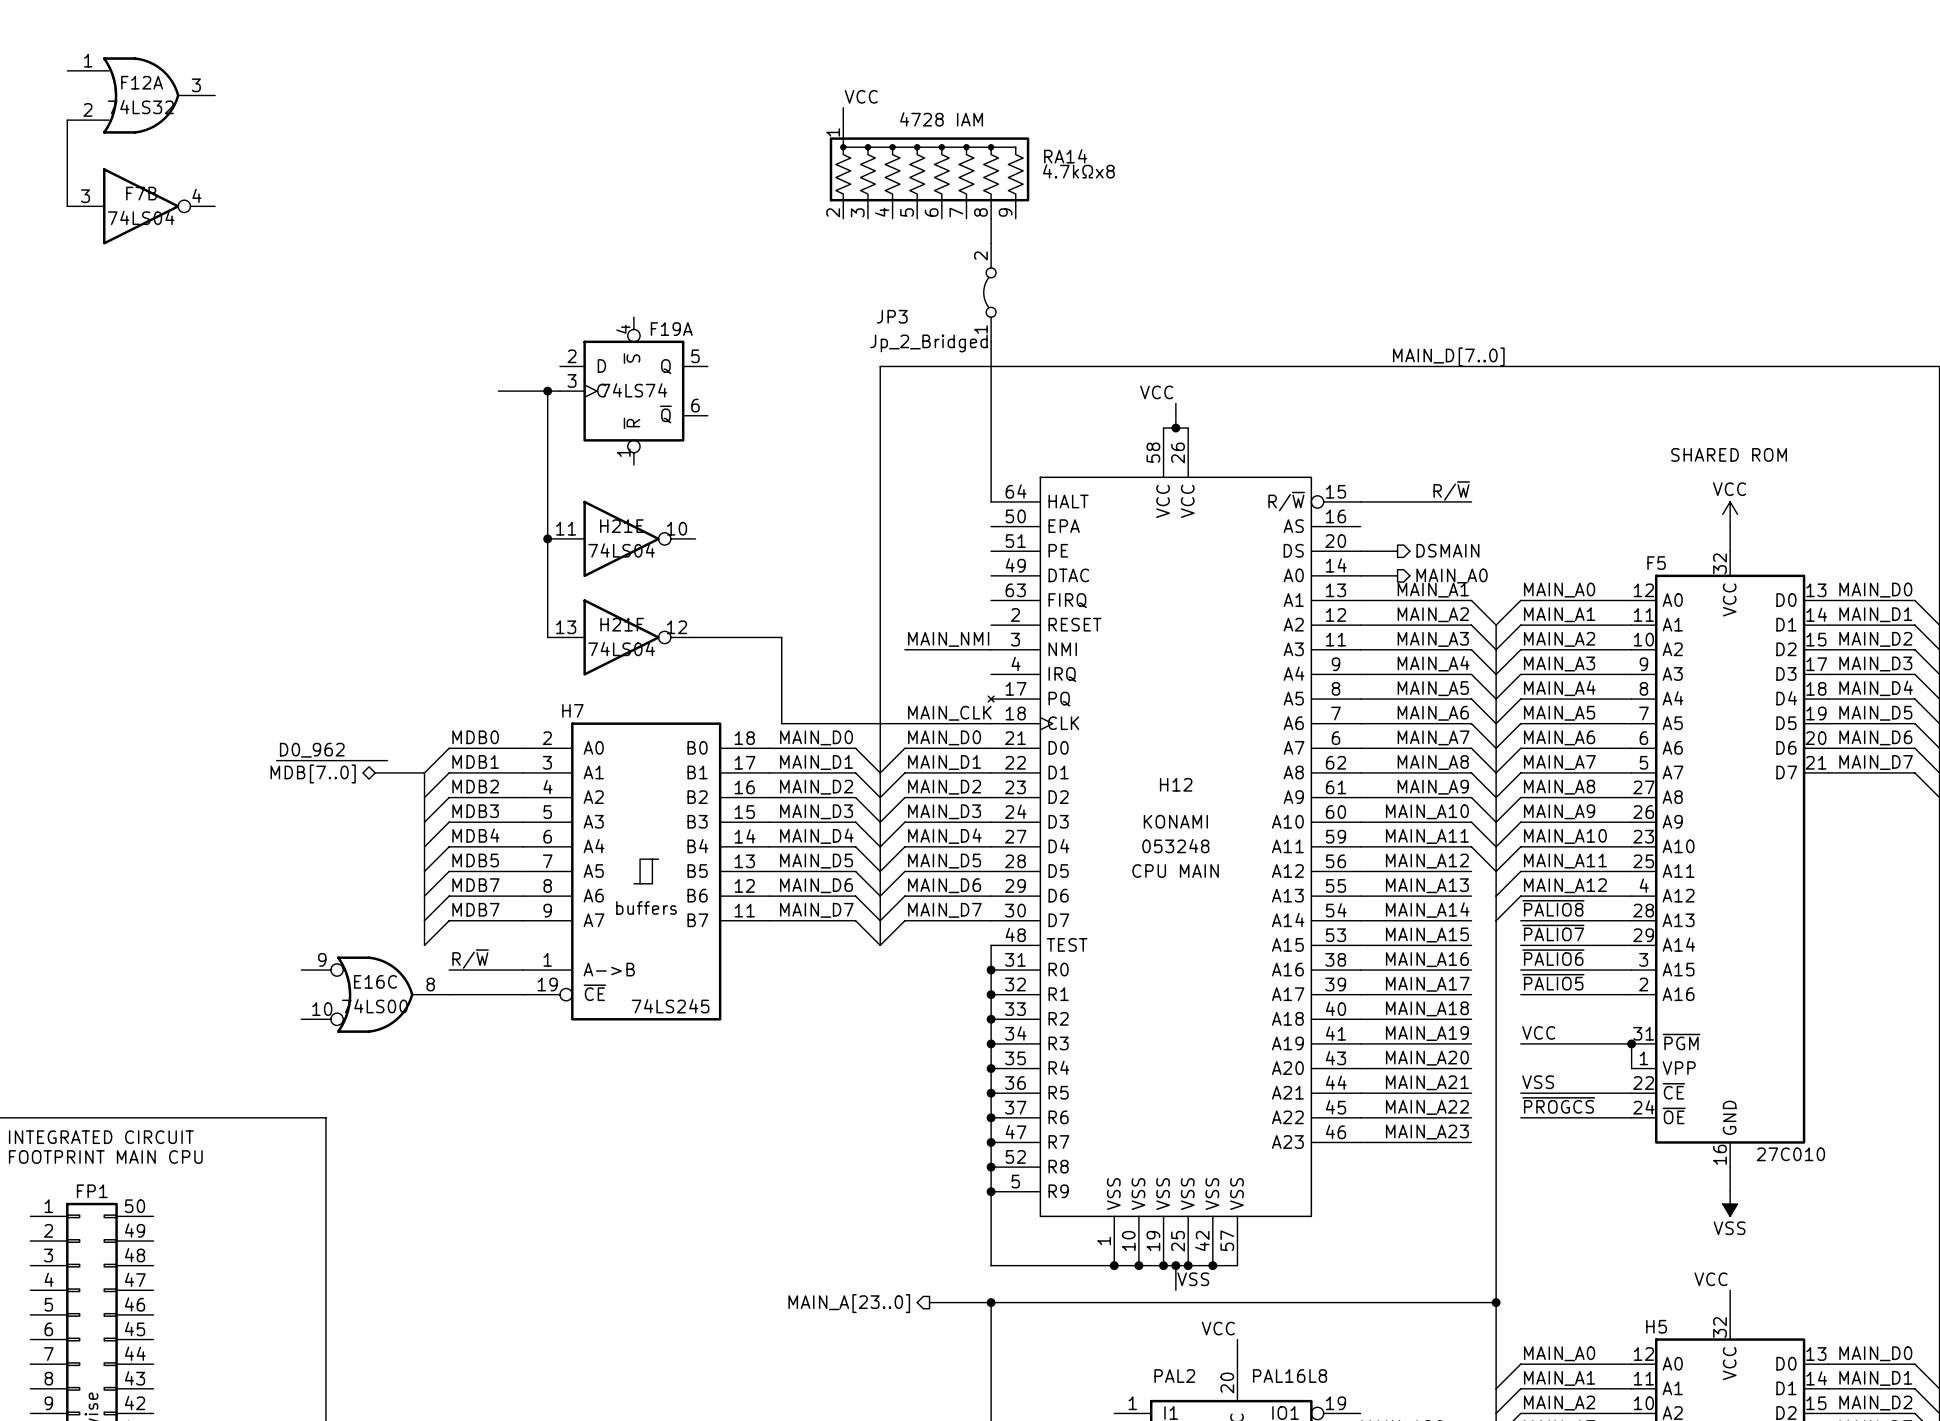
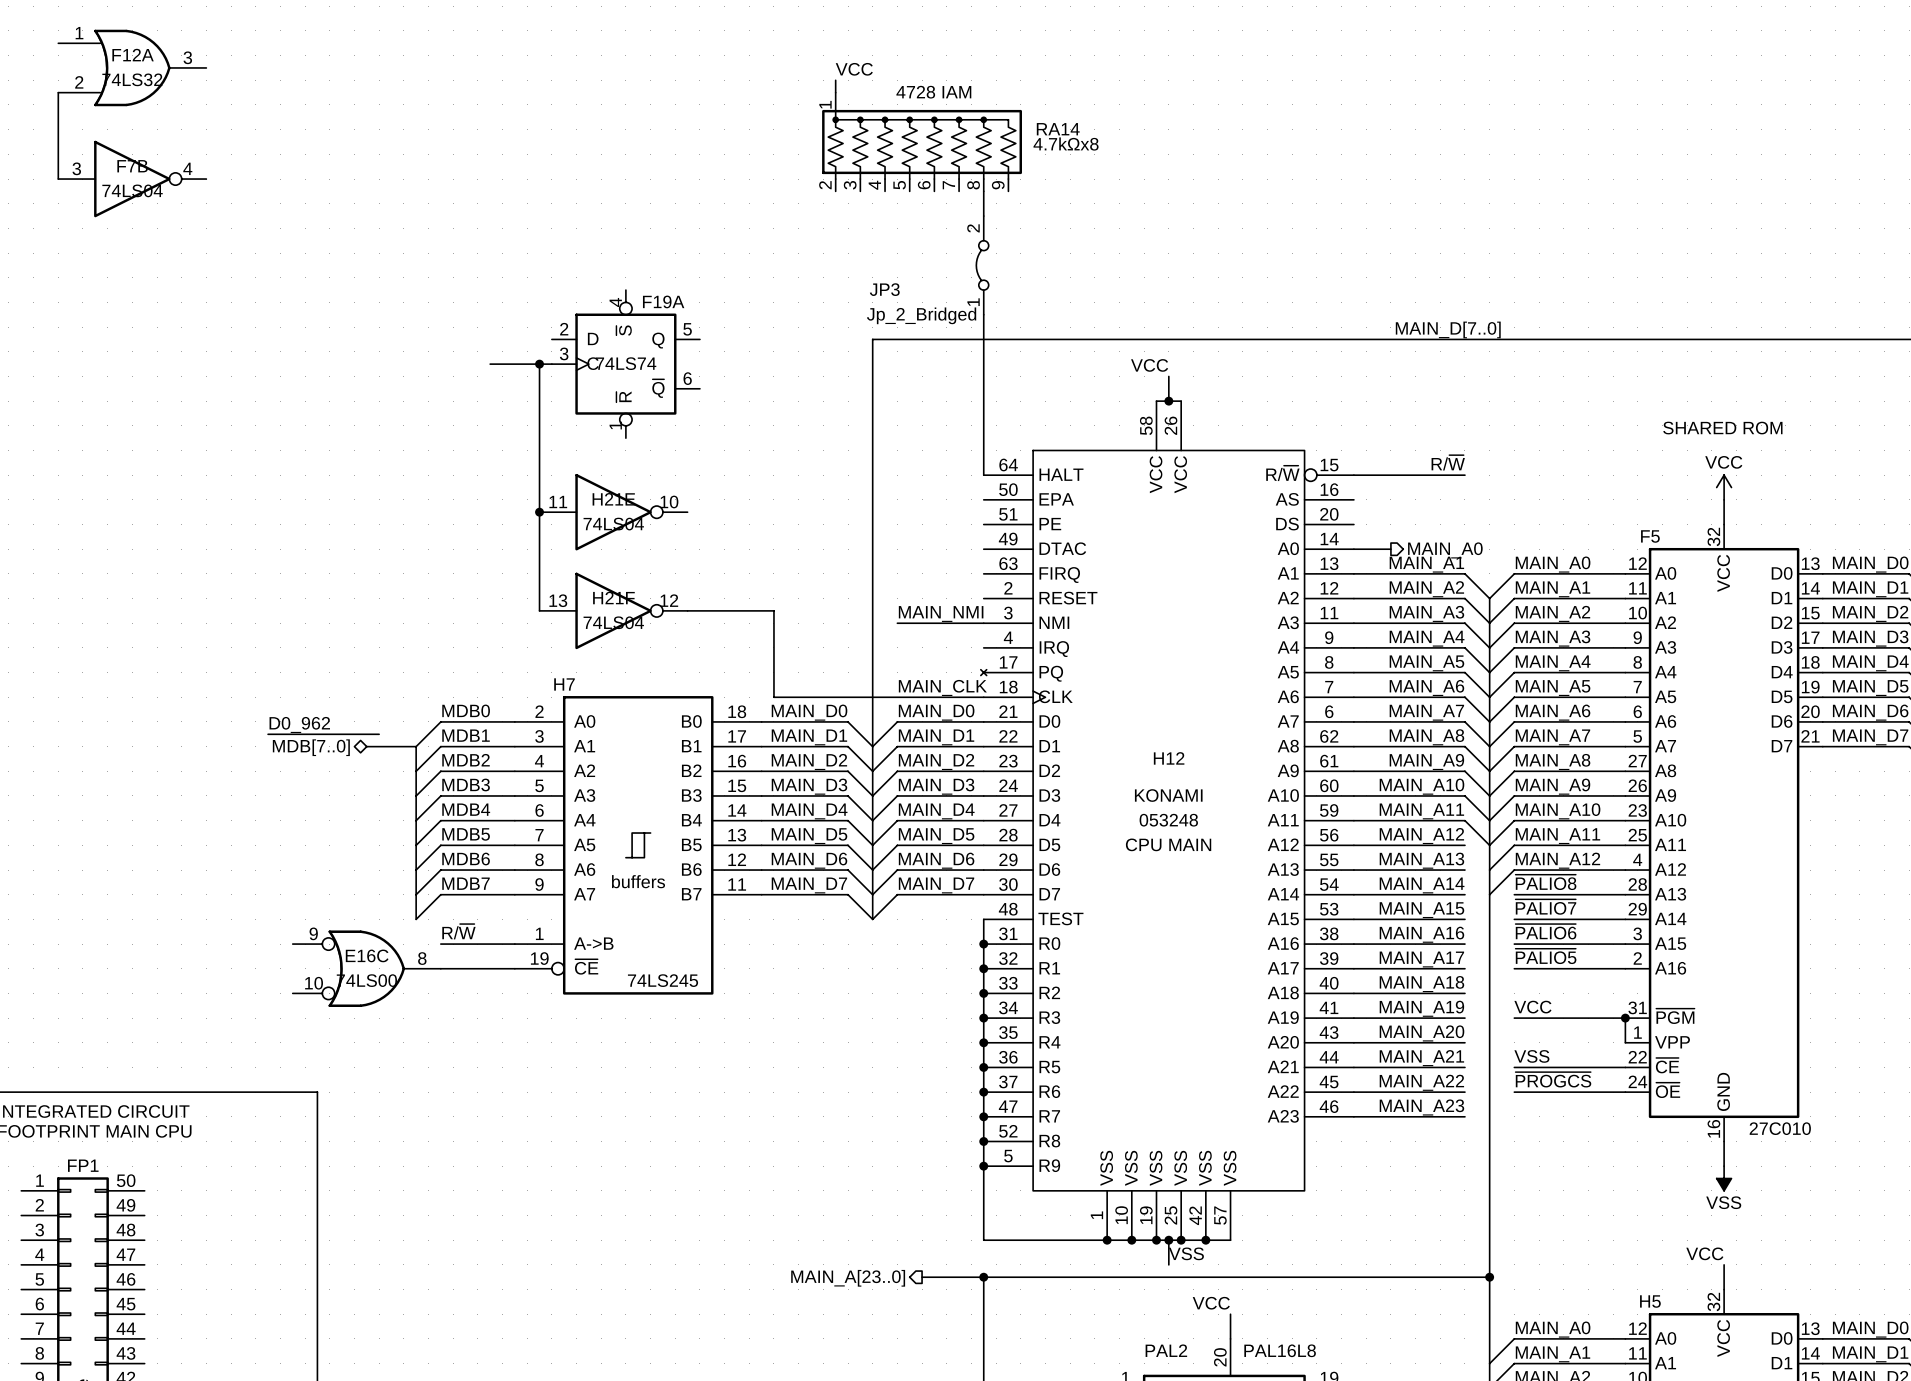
hierarchical label: DSMAIN (1447, 550) -> none
wire: (1360, 551) (1397, 551) -> none
label: MDB7 (475, 885) -> MDB6 (466, 859)

